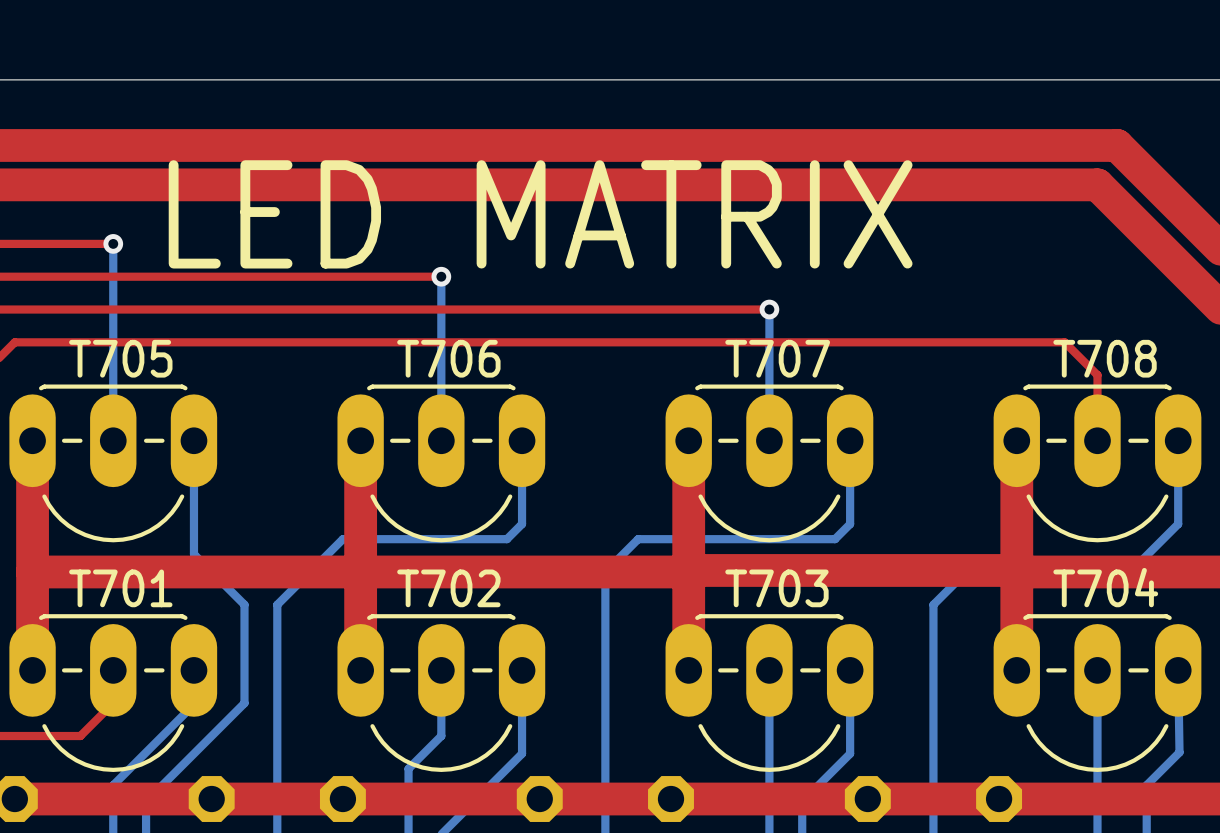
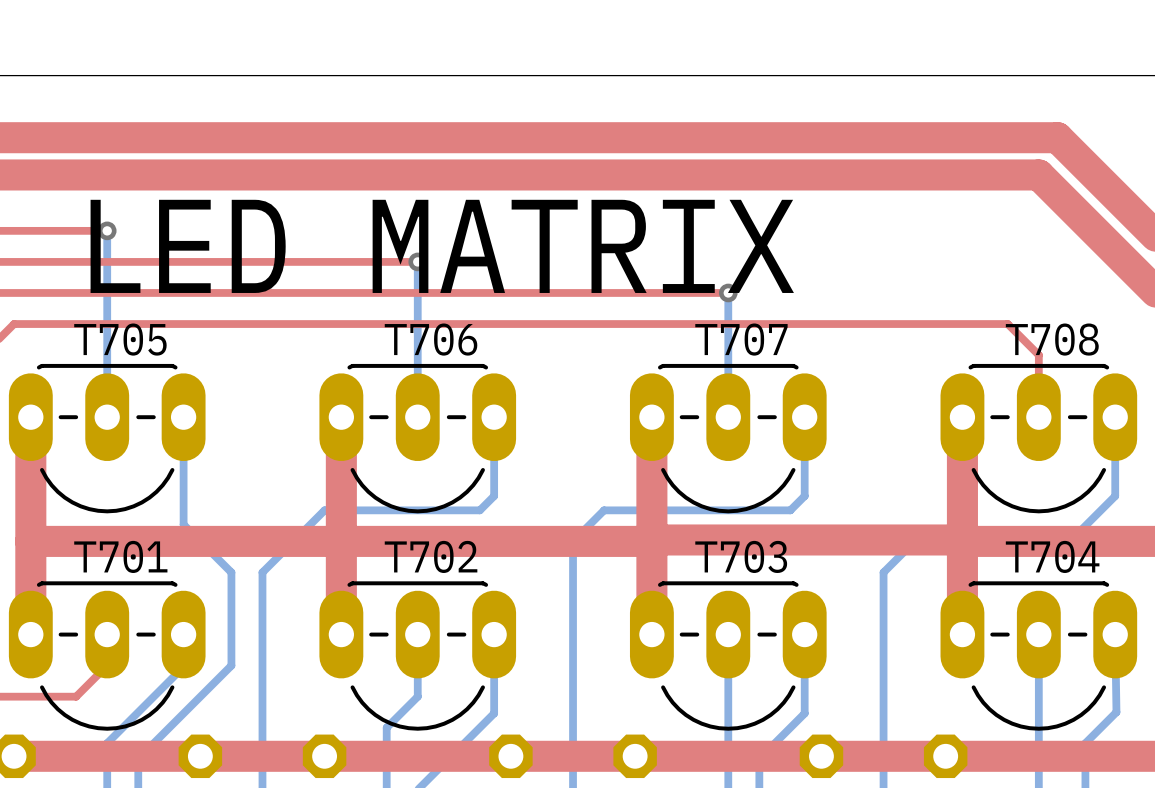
text position: LED MATRIX (540, 214) -> LED MATRIX (442, 246)

